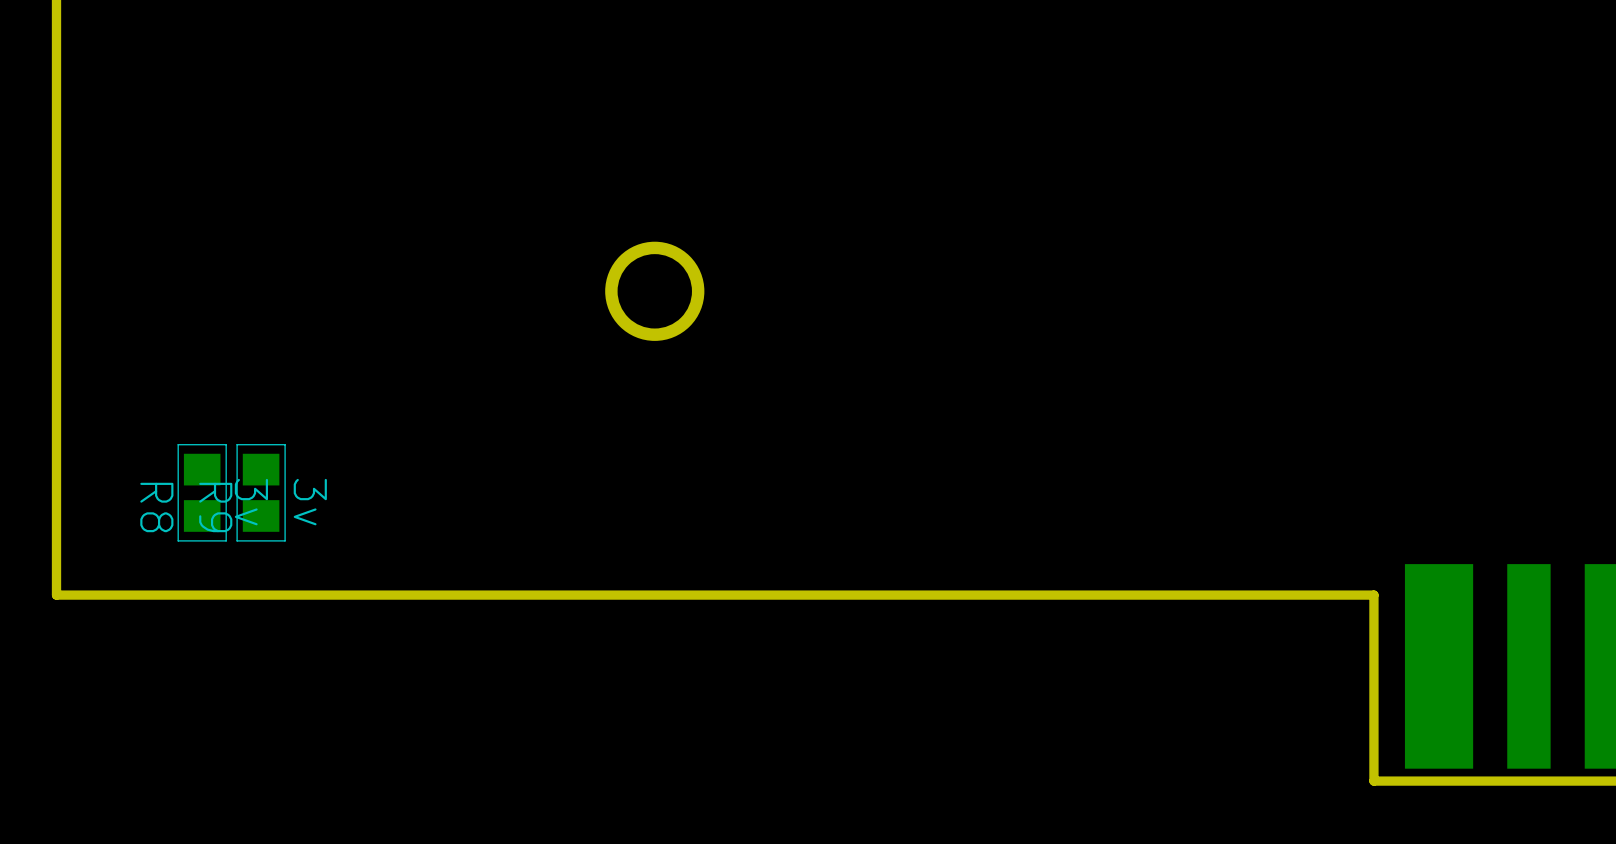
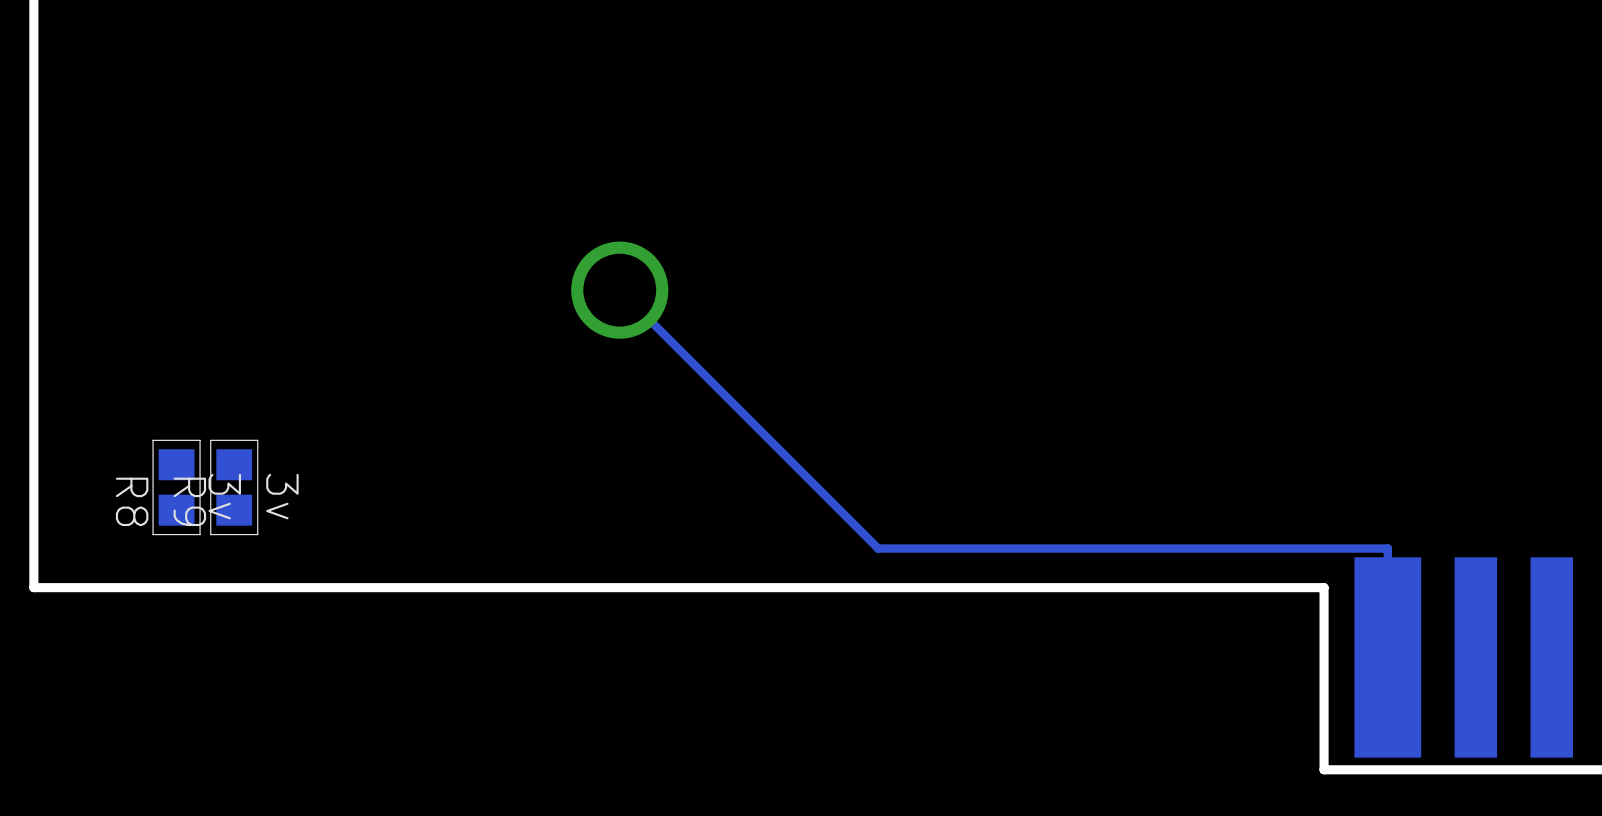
track: none -> (619, 290) (878, 548) (1387, 548) (1387, 657)

